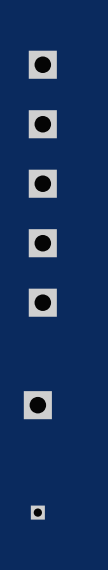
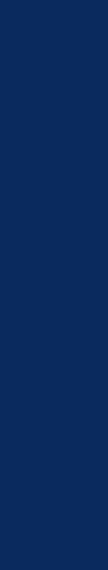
part: (42, 64) -> none
part: (42, 124) -> none
part: (42, 183) -> none
part: (42, 243) -> none
part: (42, 302) -> none
part: (37, 405) -> none
part: (37, 512) -> none

